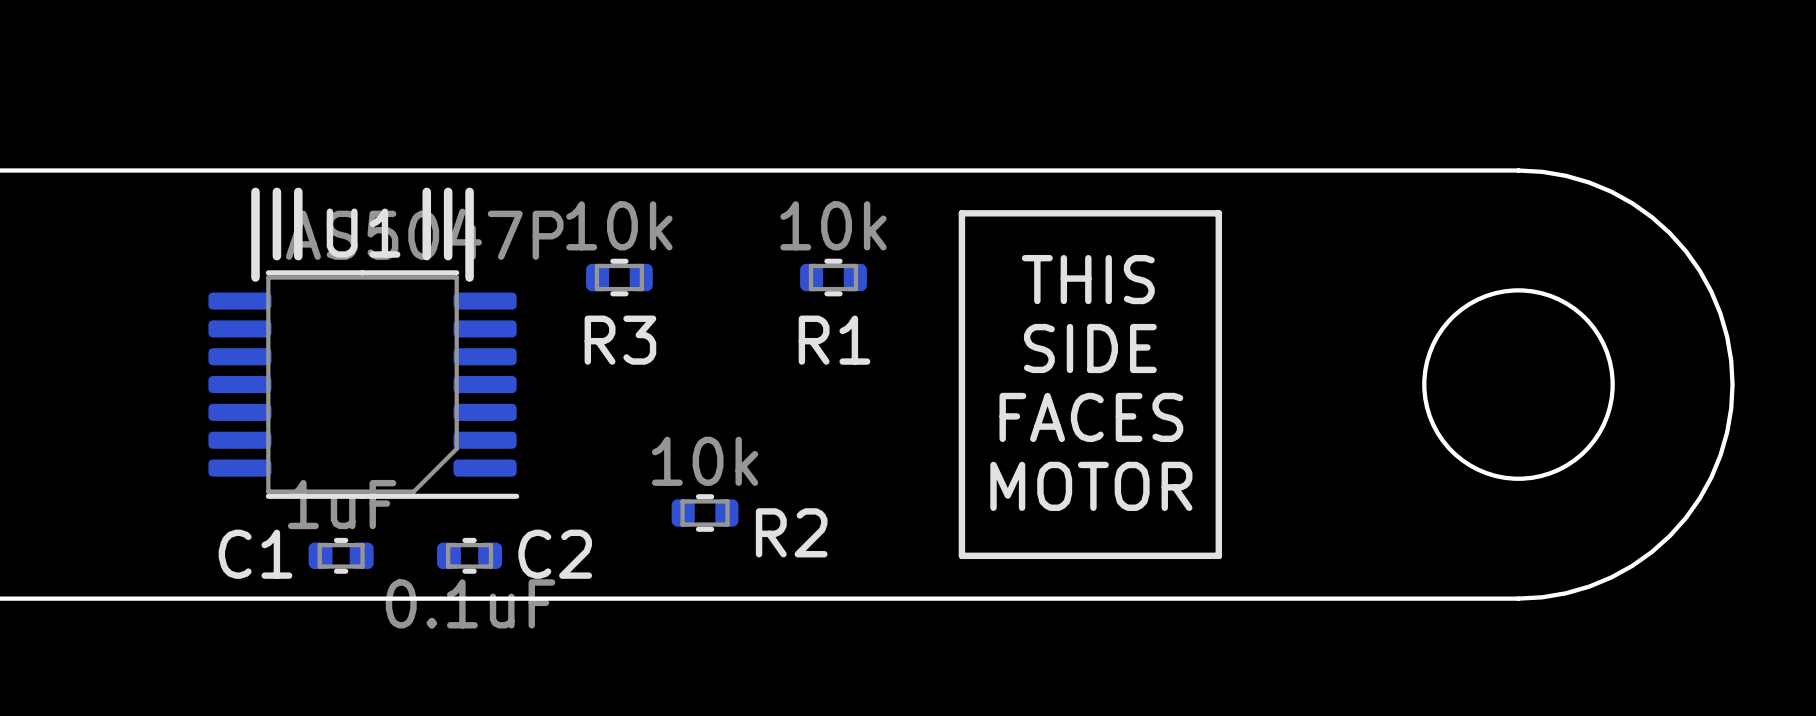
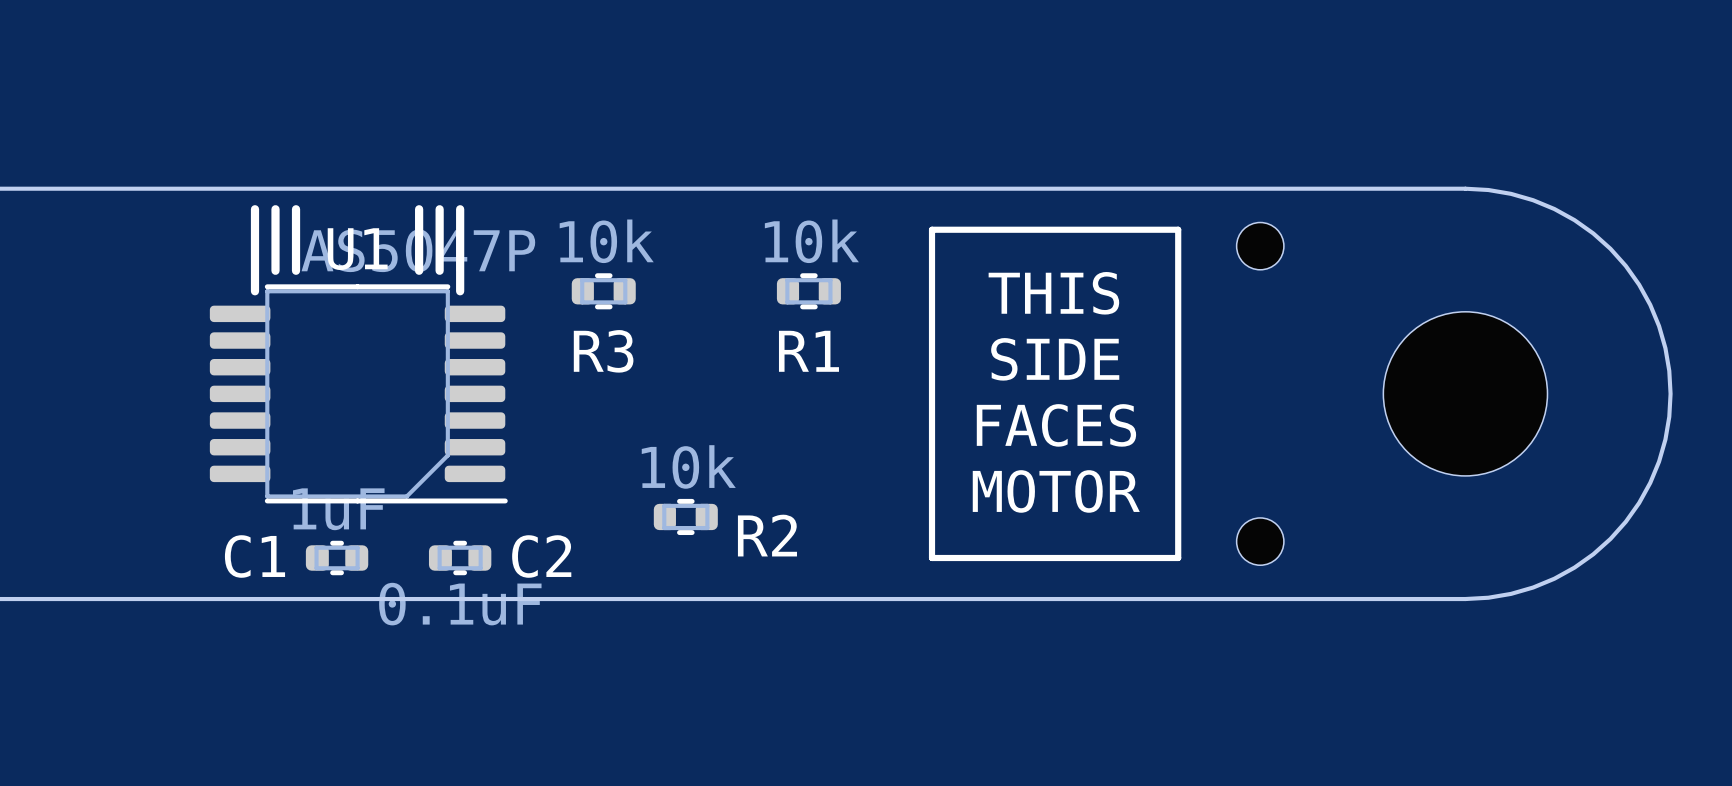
part: none -> (1260, 246)
round board edge: [1422, 288, 1615, 481] -> none
part: none -> (1465, 393)
part: none -> (1260, 541)

